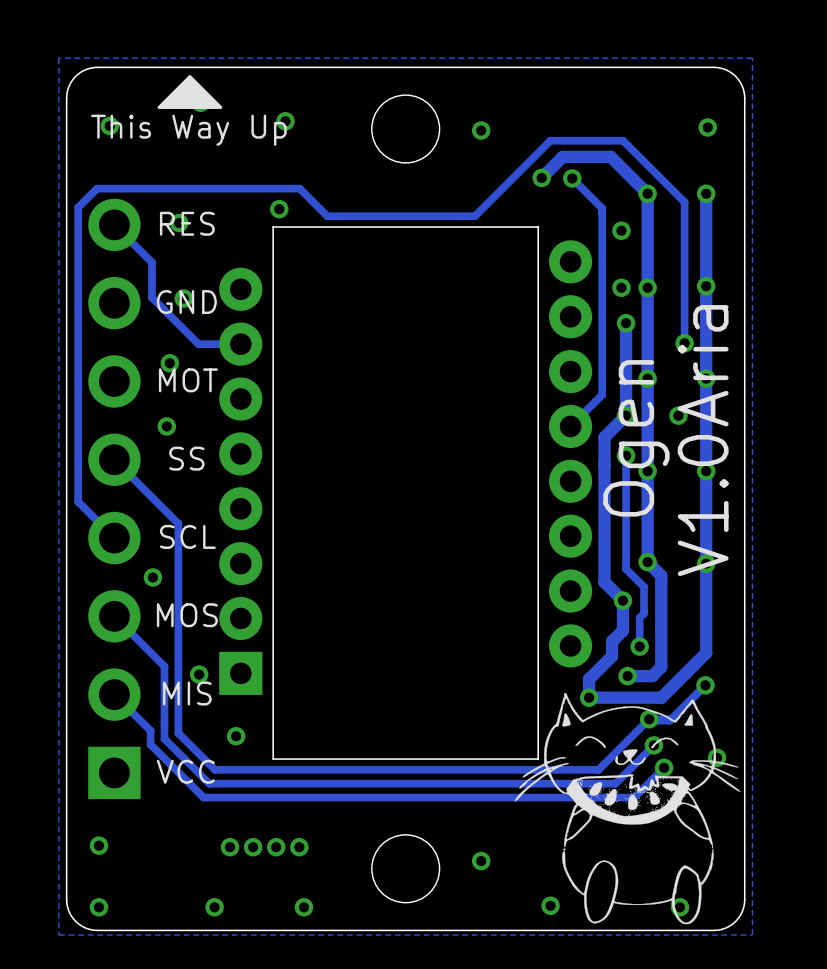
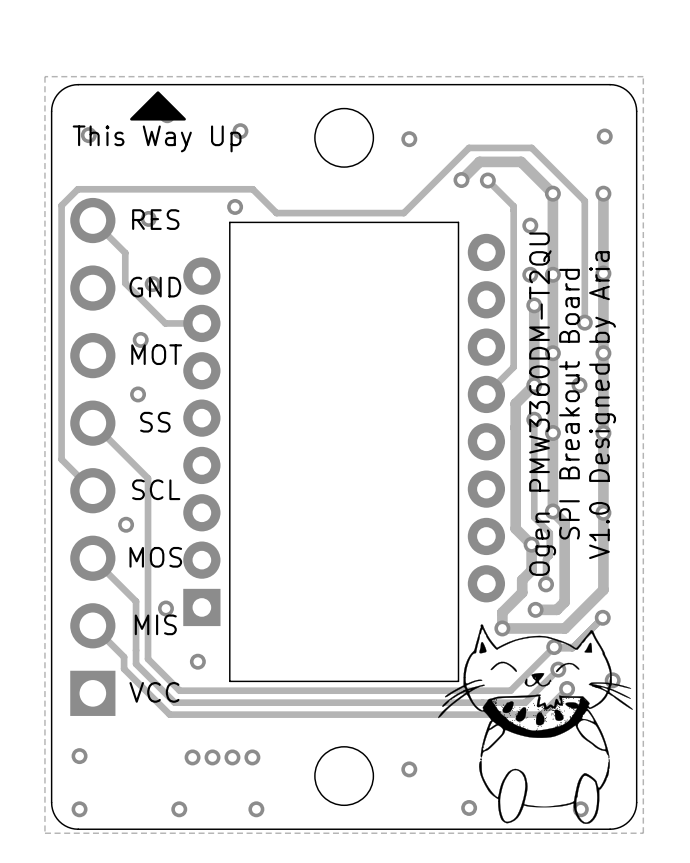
text: none -> SPI Breakout Board (569, 404)
text: Ogen (636, 438) -> Ogen PMW3360DM-T2QU (542, 404)
text: V1.0Aria (703, 440) -> V1.0 Designed by Aria (602, 405)

